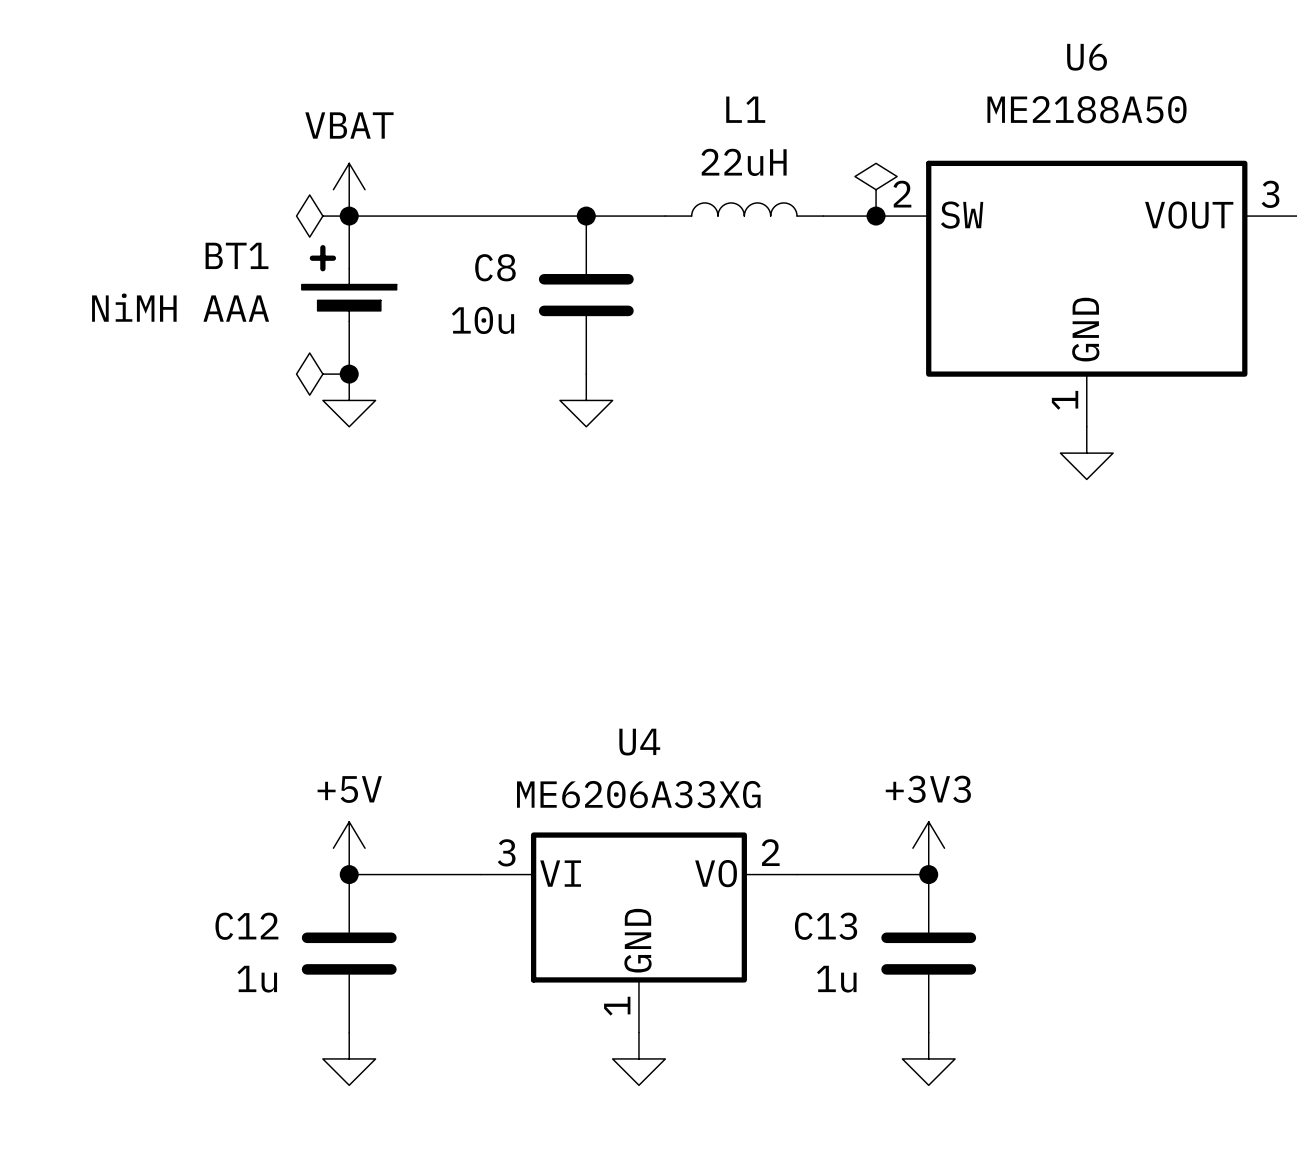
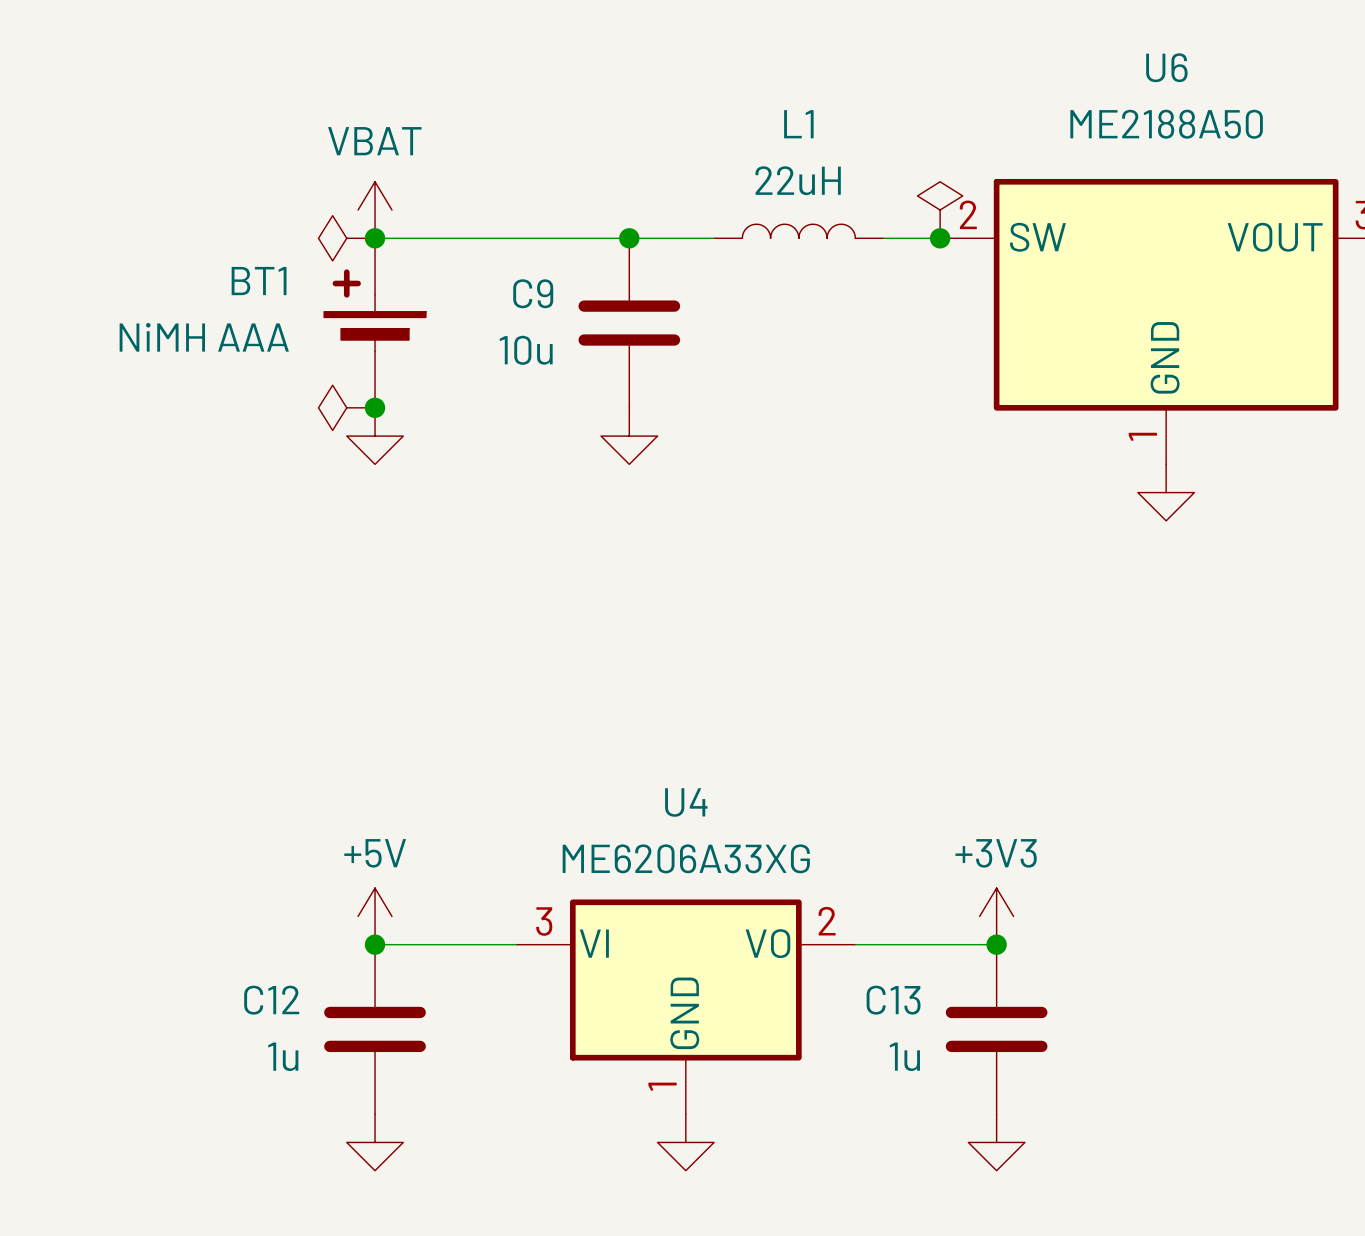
C8 name: C8 (495, 267) -> C9 (533, 293)

